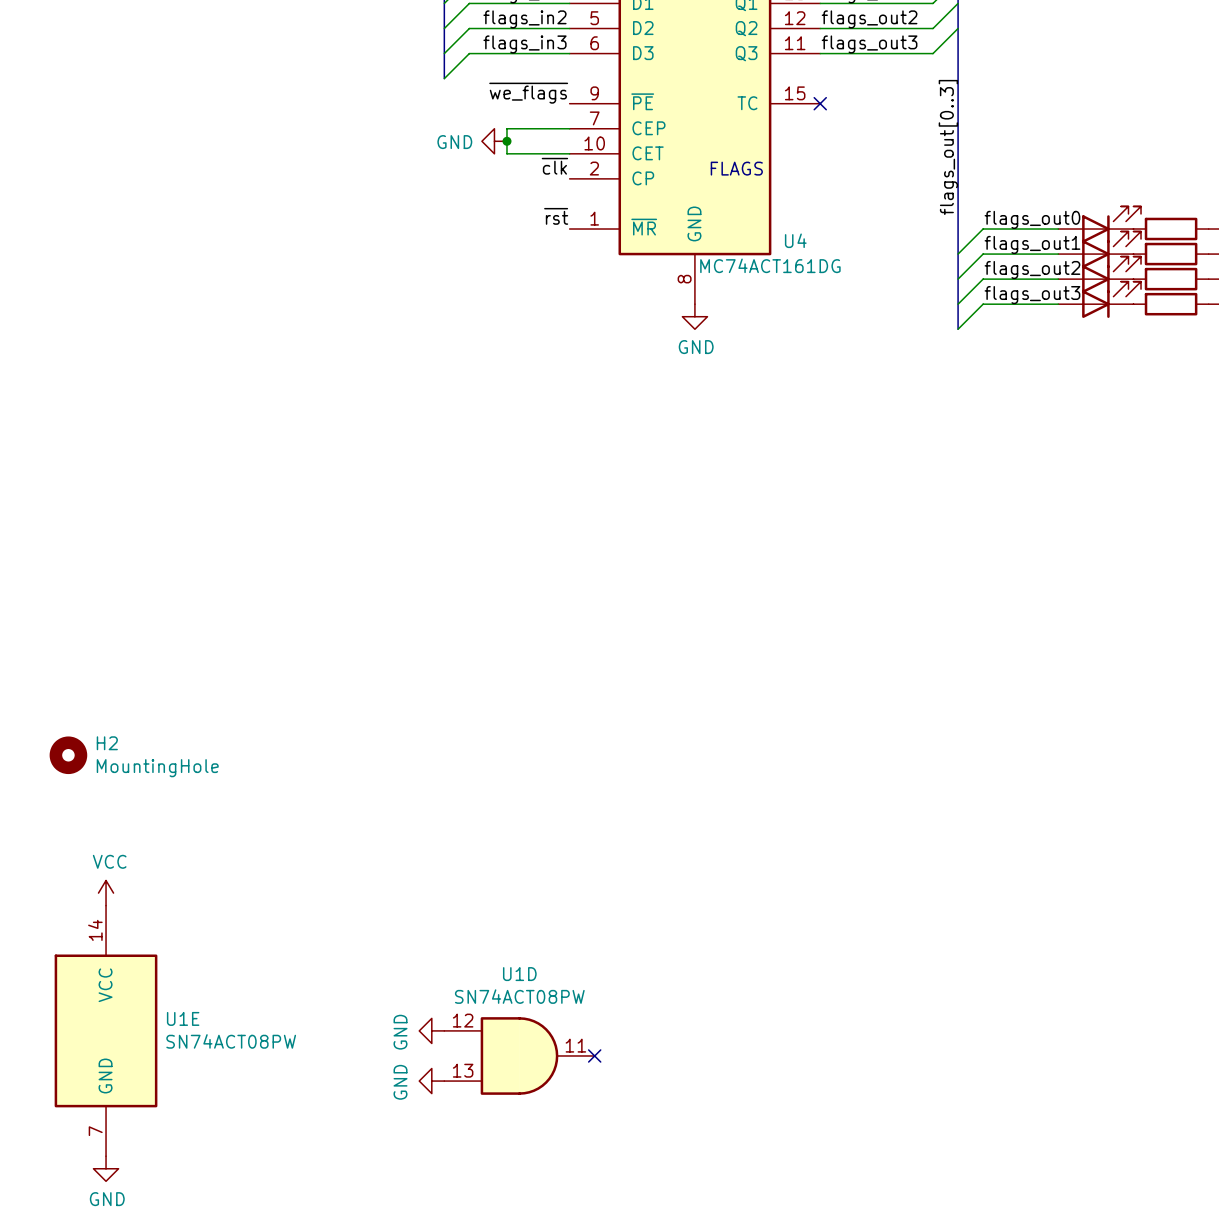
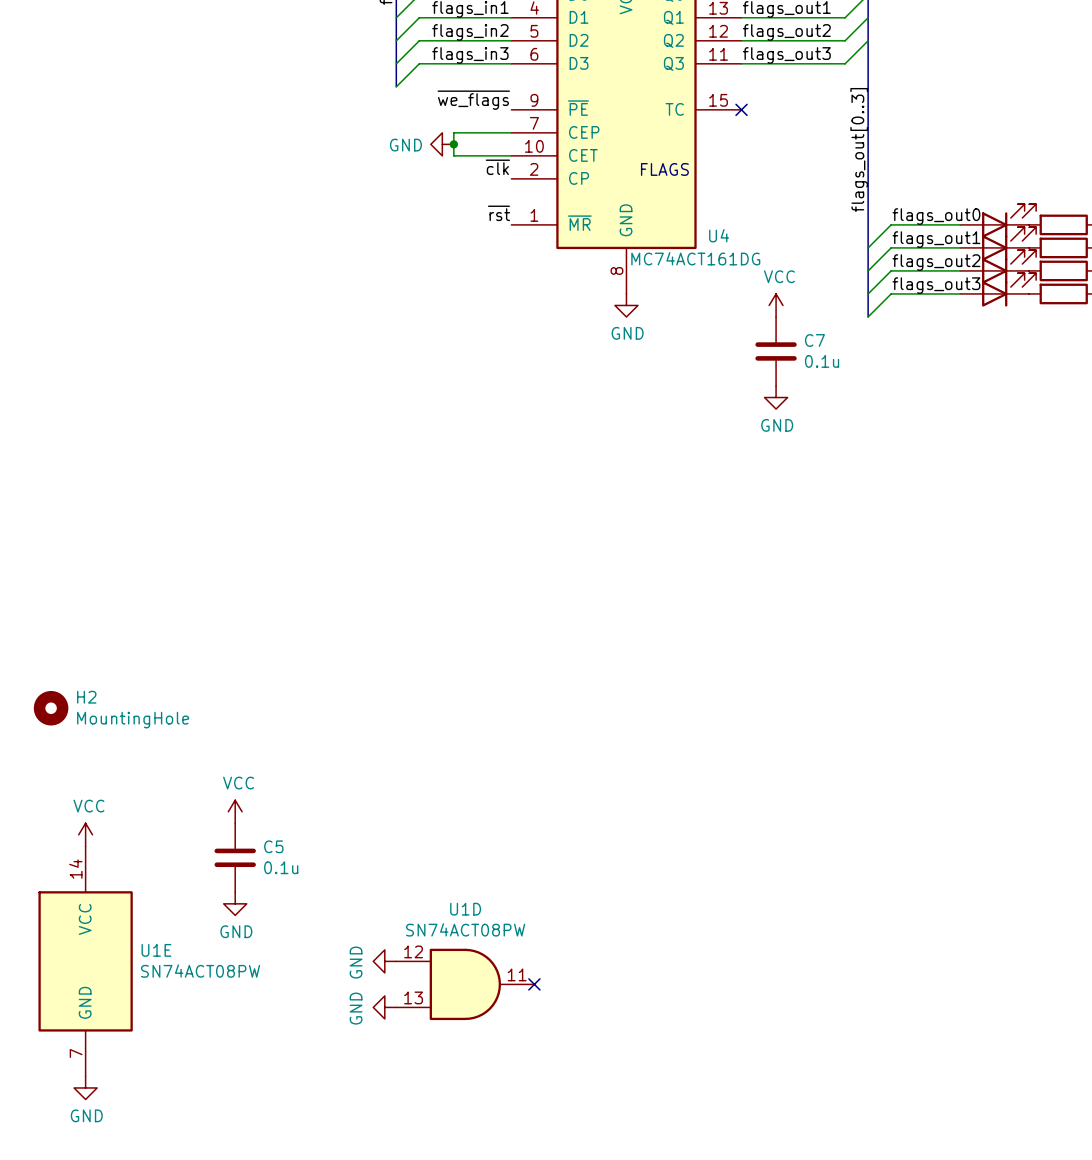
power symbol: none -> VCC (776, 305)
C7: none -> 0.1u (776, 351)
power symbol: none -> GND (776, 397)
power symbol: none -> VCC (235, 811)
C5: none -> 0.1u (235, 857)
power symbol: none -> GND (235, 903)

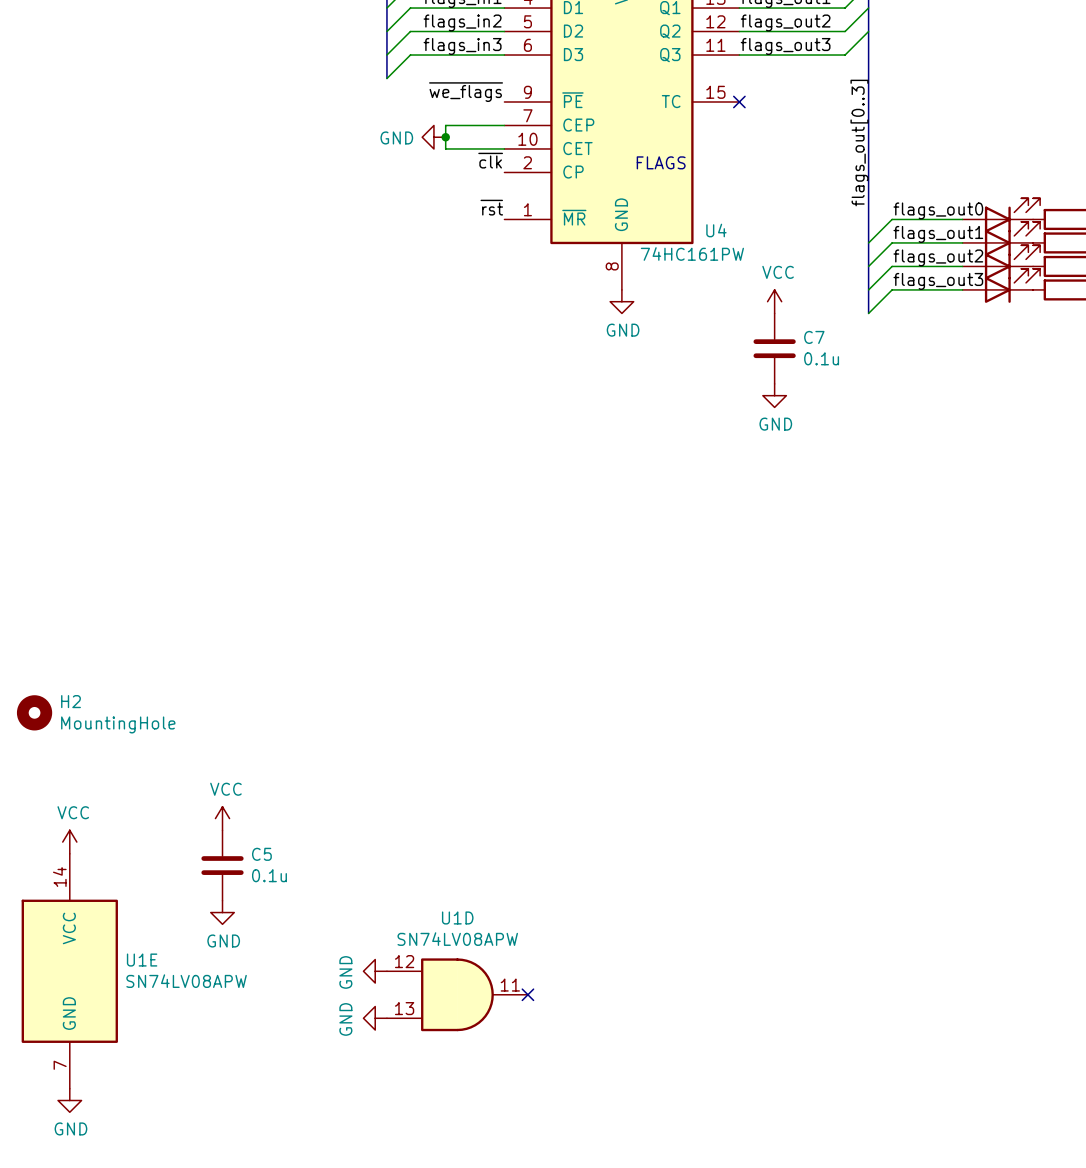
U4 value: MC74ACT161DG (695, 258) -> 74HC161PW (692, 253)
U1D value: SN74ACT08PW (465, 929) -> SN74LV08APW (457, 939)
U1E value: SN74ACT08PW (200, 971) -> SN74LV08APW (186, 981)

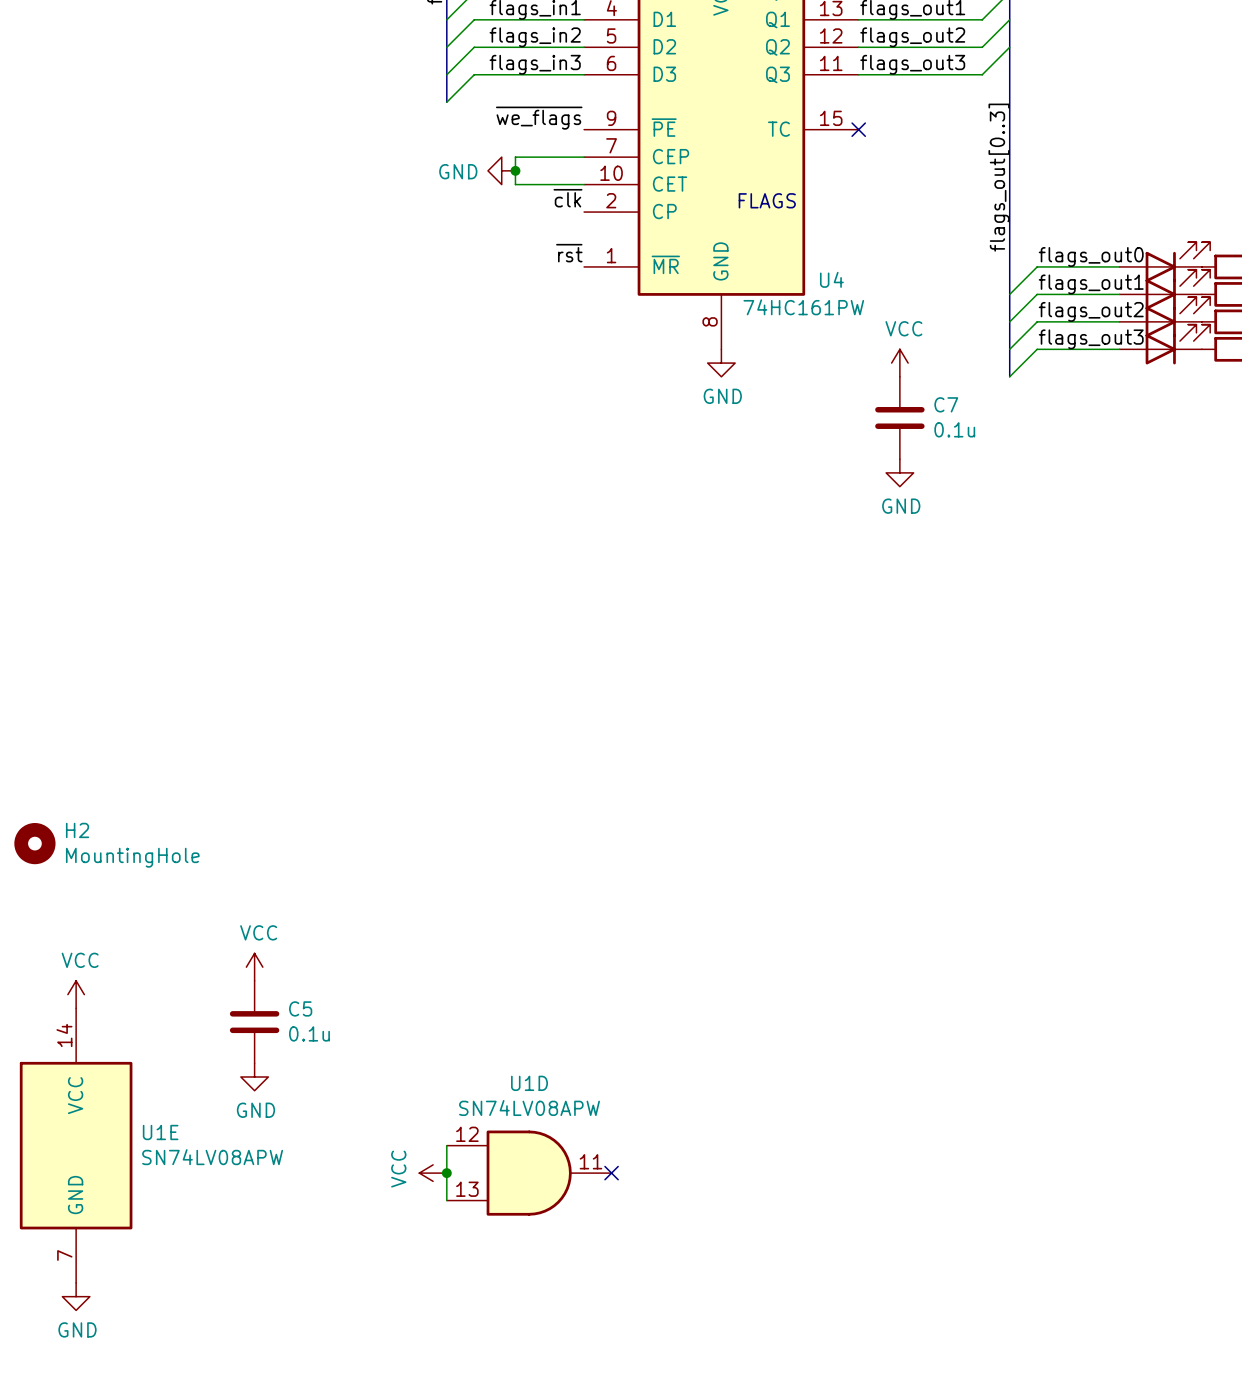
power symbol: GND (375, 971) -> none
wire: none -> (446, 1145) (446, 1200)
power symbol: none -> VCC (433, 1173)
junction: none -> (446, 1173)
power symbol: GND (375, 1018) -> none

